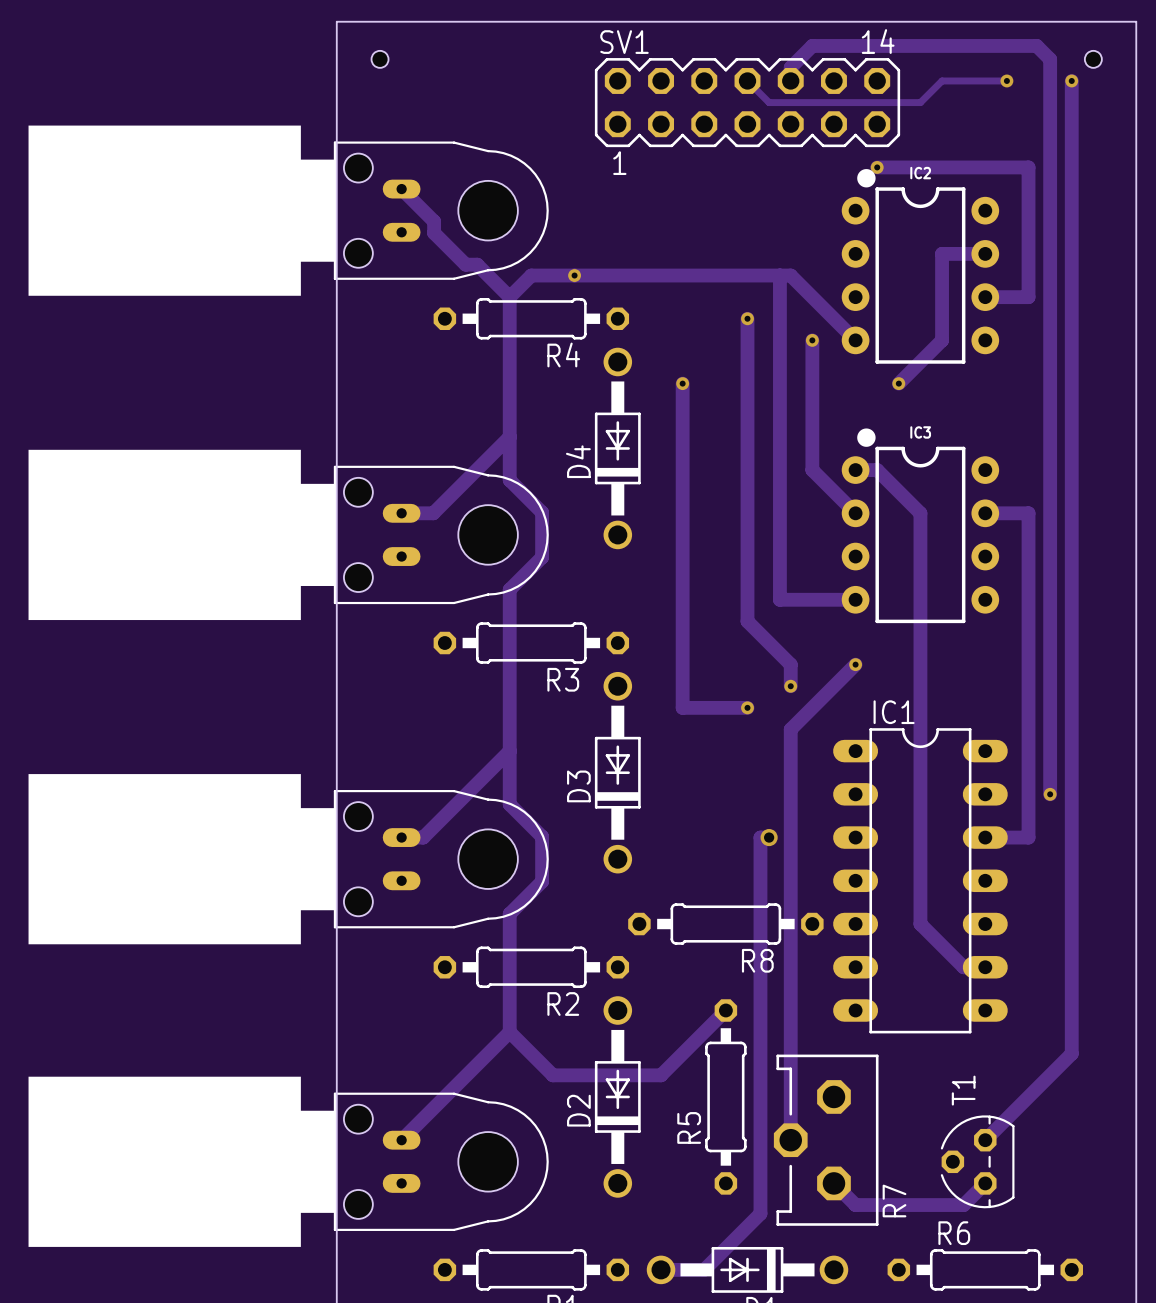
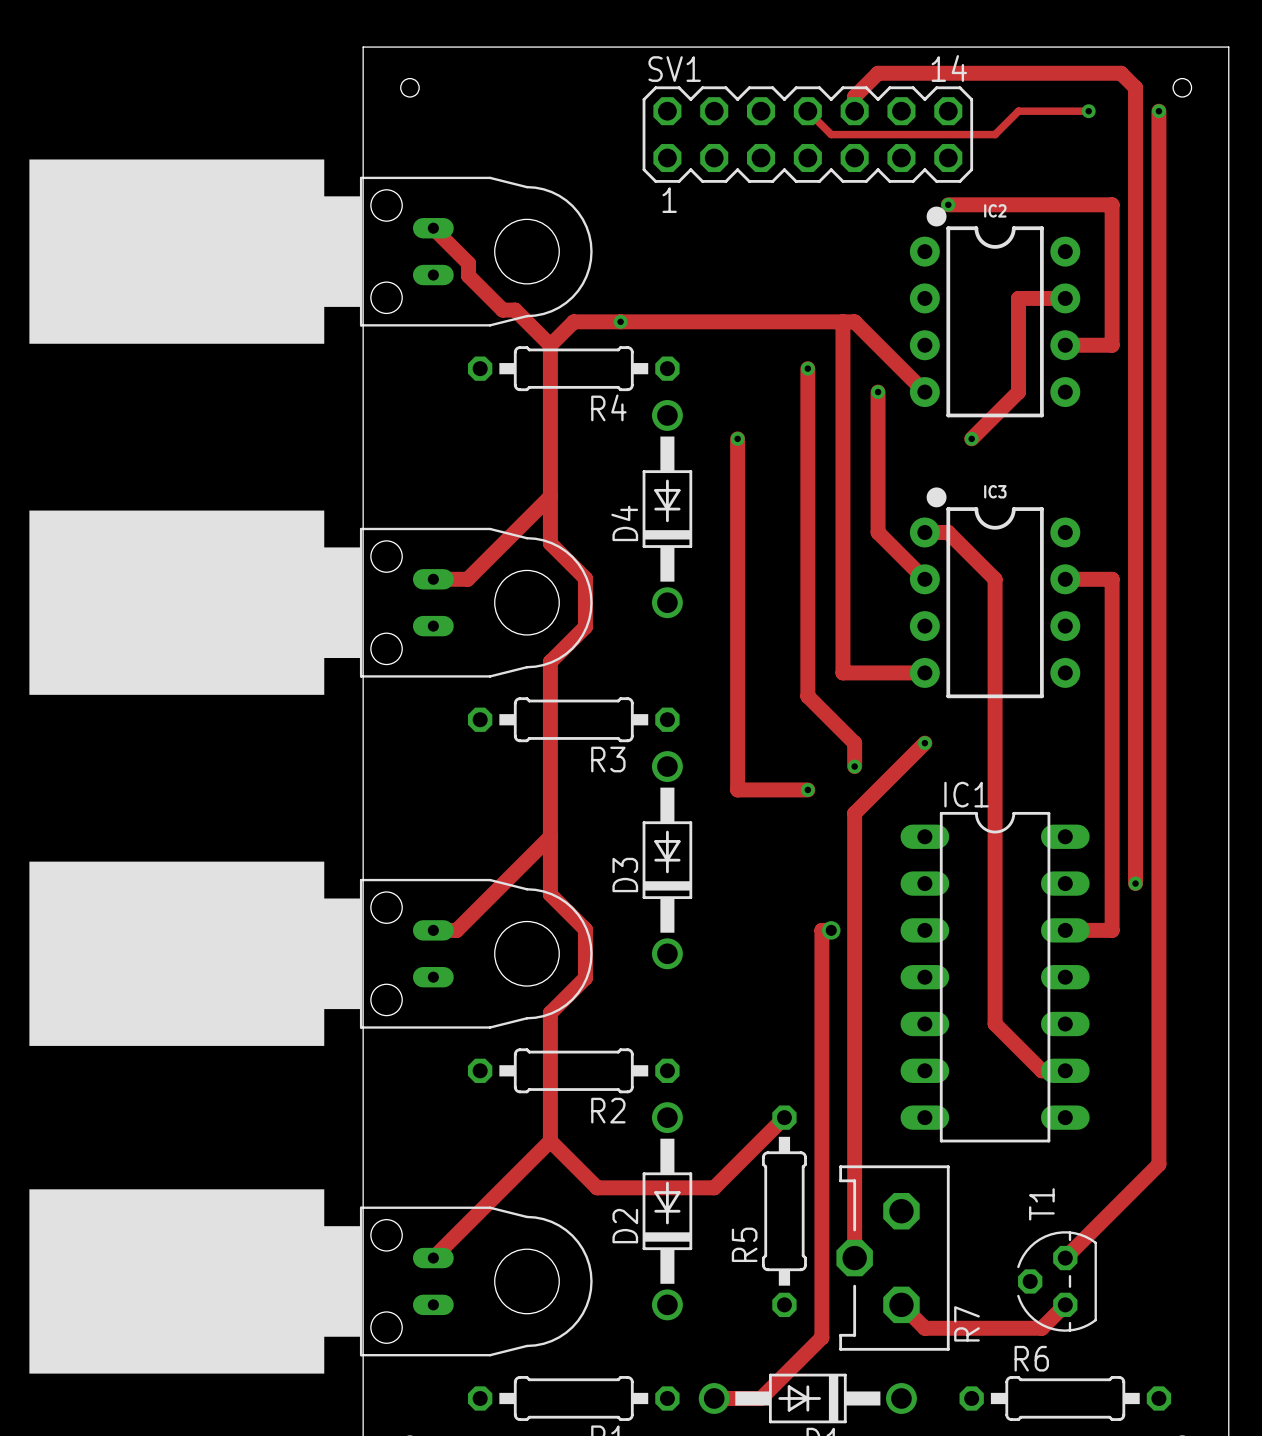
R8: (725, 924) -> none

